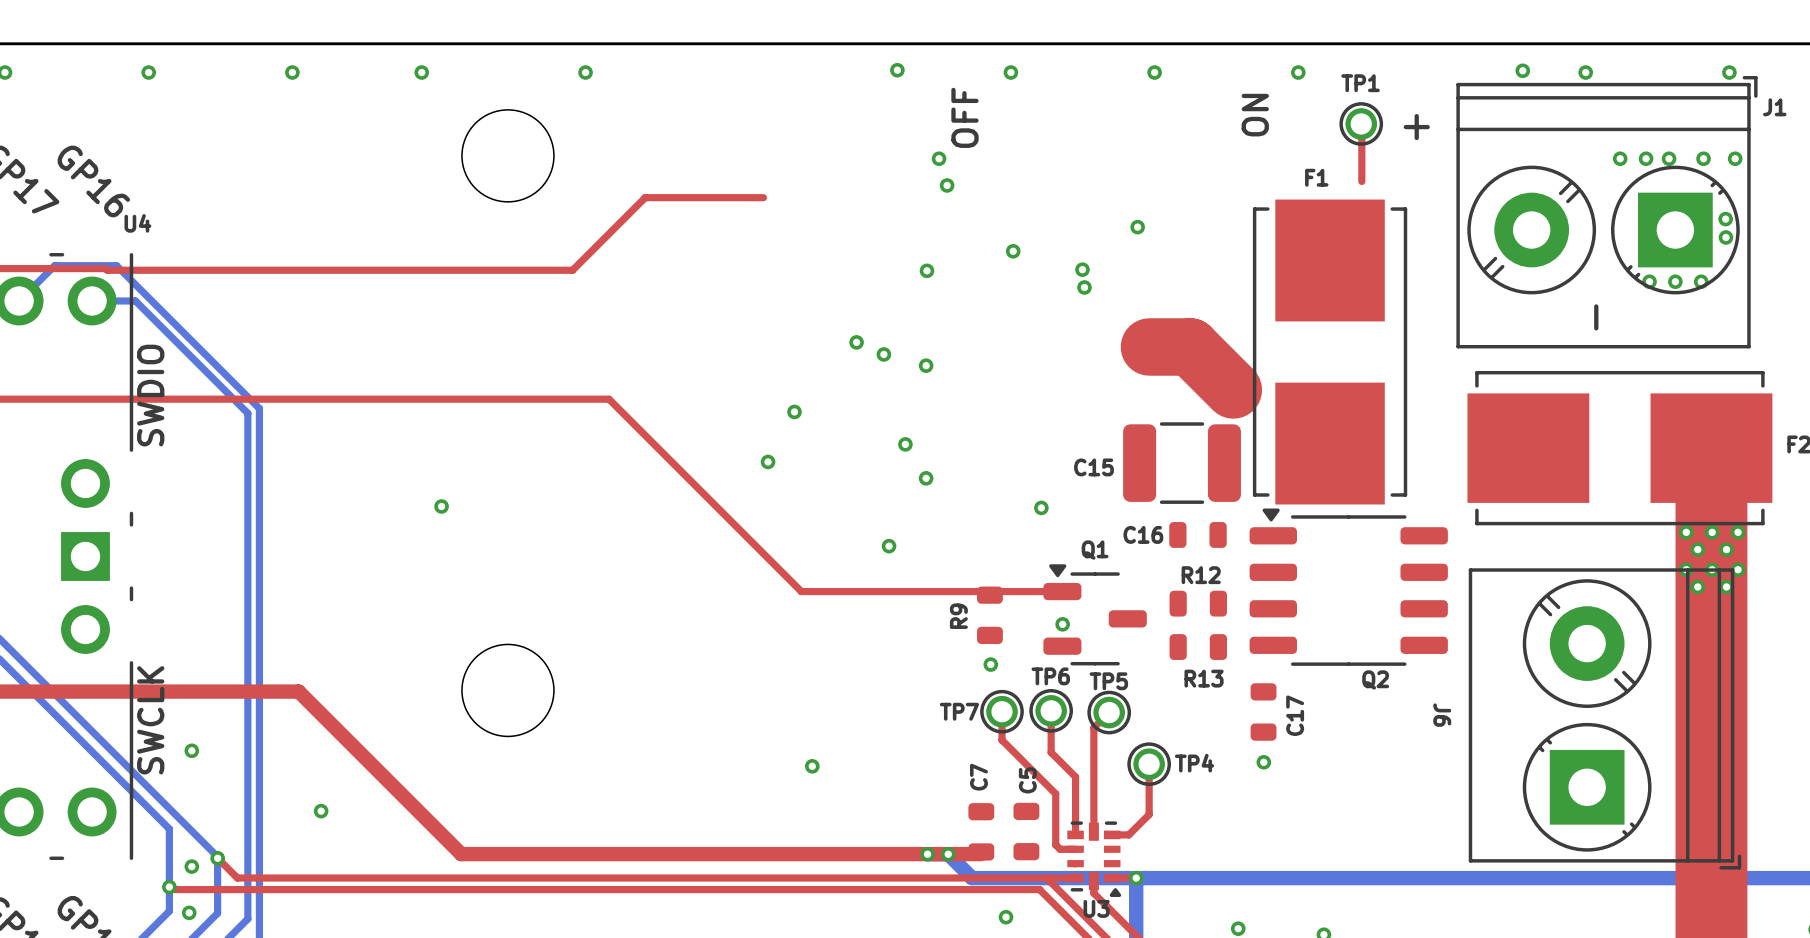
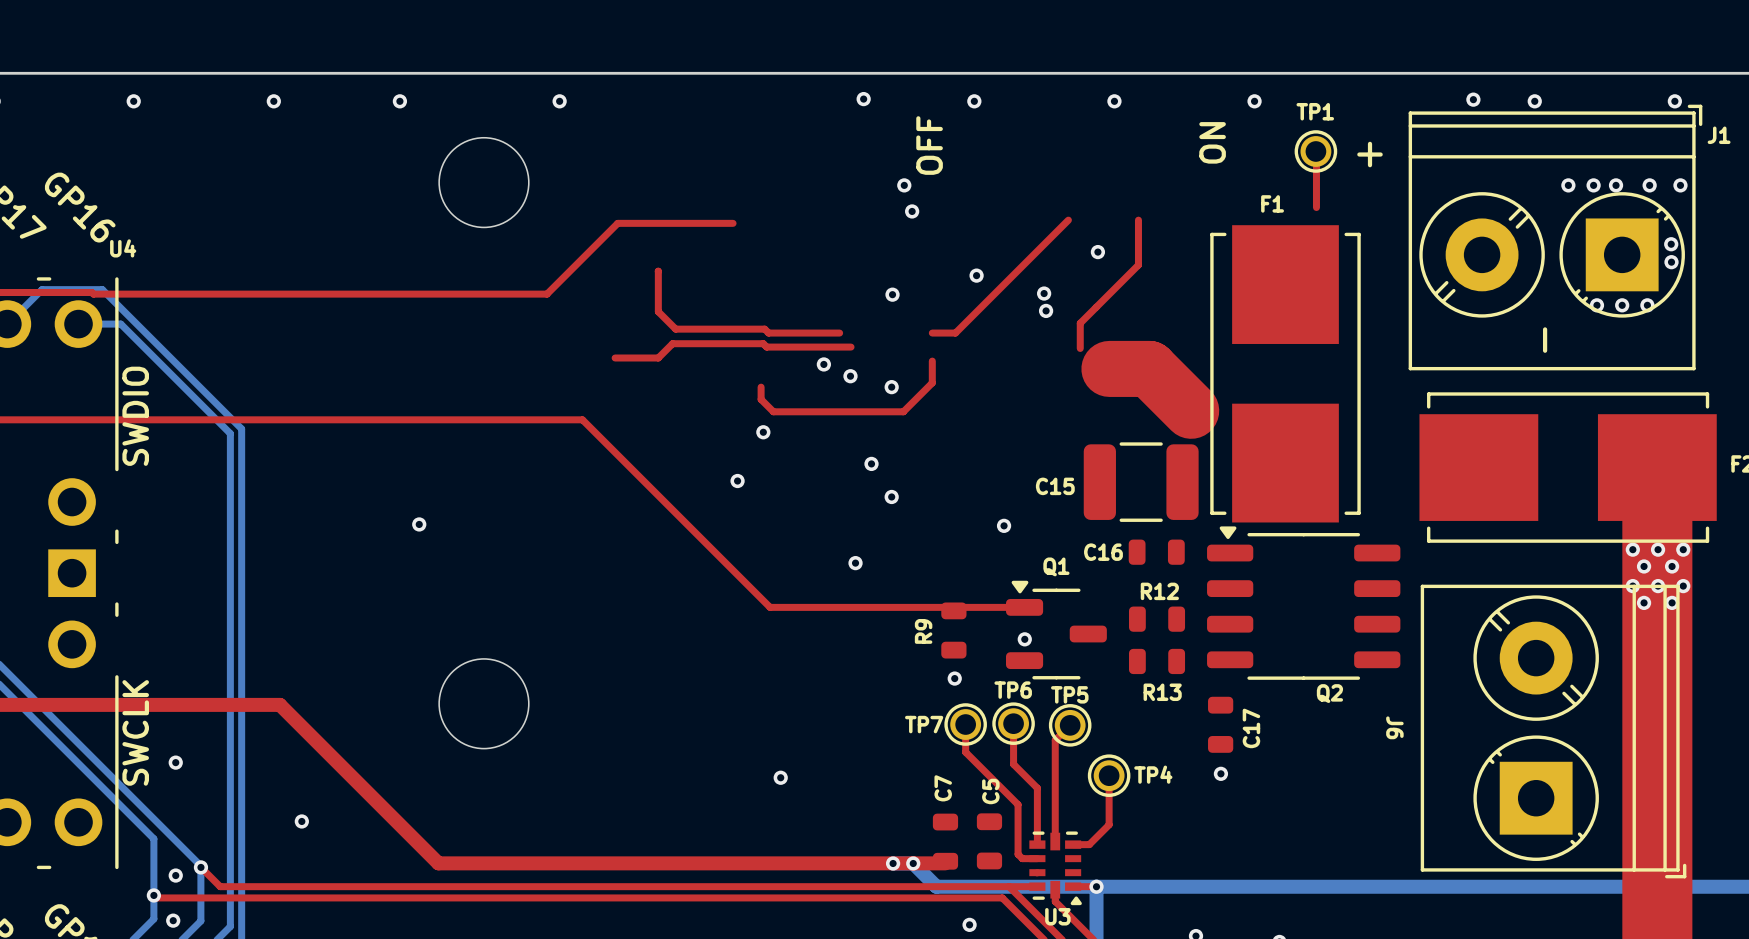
top track: none -> (1068, 220) (955, 333) (932, 333)
top track: none -> (1138, 220) (1138, 265) (1080, 323) (1080, 348)
top track: none -> (658, 271) (658, 311) (675, 329) (764, 329) (768, 333) (839, 333)
top track: none -> (851, 347) (766, 347) (763, 343) (672, 343) (658, 358) (615, 358)
top track: none -> (932, 361) (932, 382) (903, 411) (773, 411) (761, 399) (761, 387)

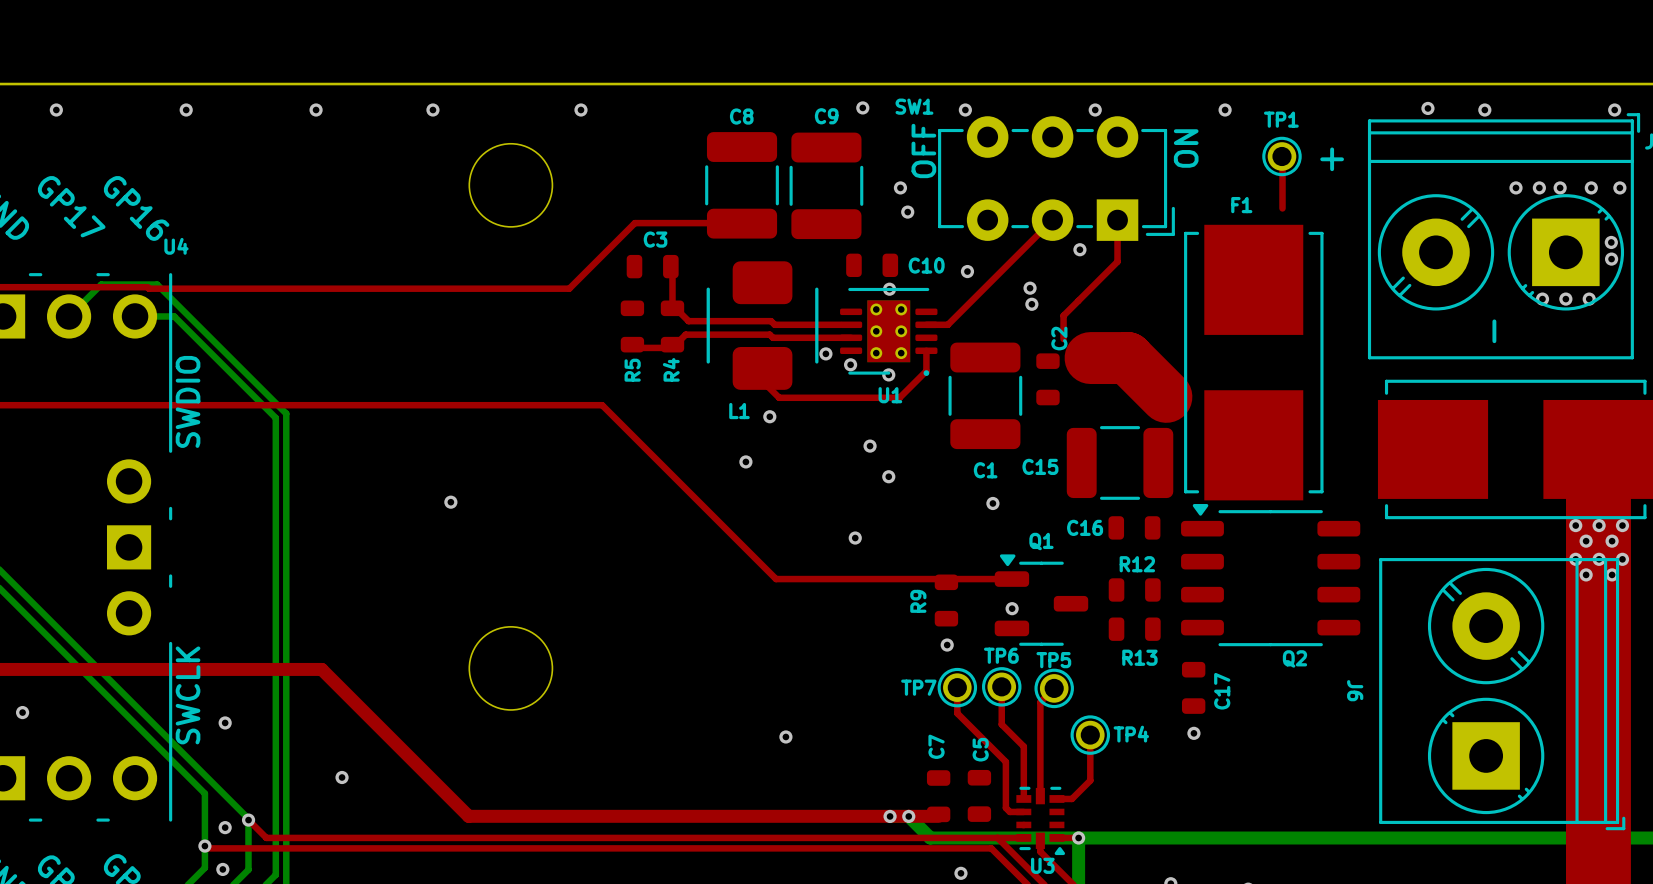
SW1: none -> (1056, 178)
C8: none -> (742, 185)
C9: none -> (826, 185)
C10: none -> (872, 265)
C3: none -> (652, 266)
L1: none -> (762, 325)
R5: none -> (632, 326)
R4: none -> (672, 326)
U1: none -> (888, 331)
C2: none -> (1047, 379)
C1: none -> (985, 395)

